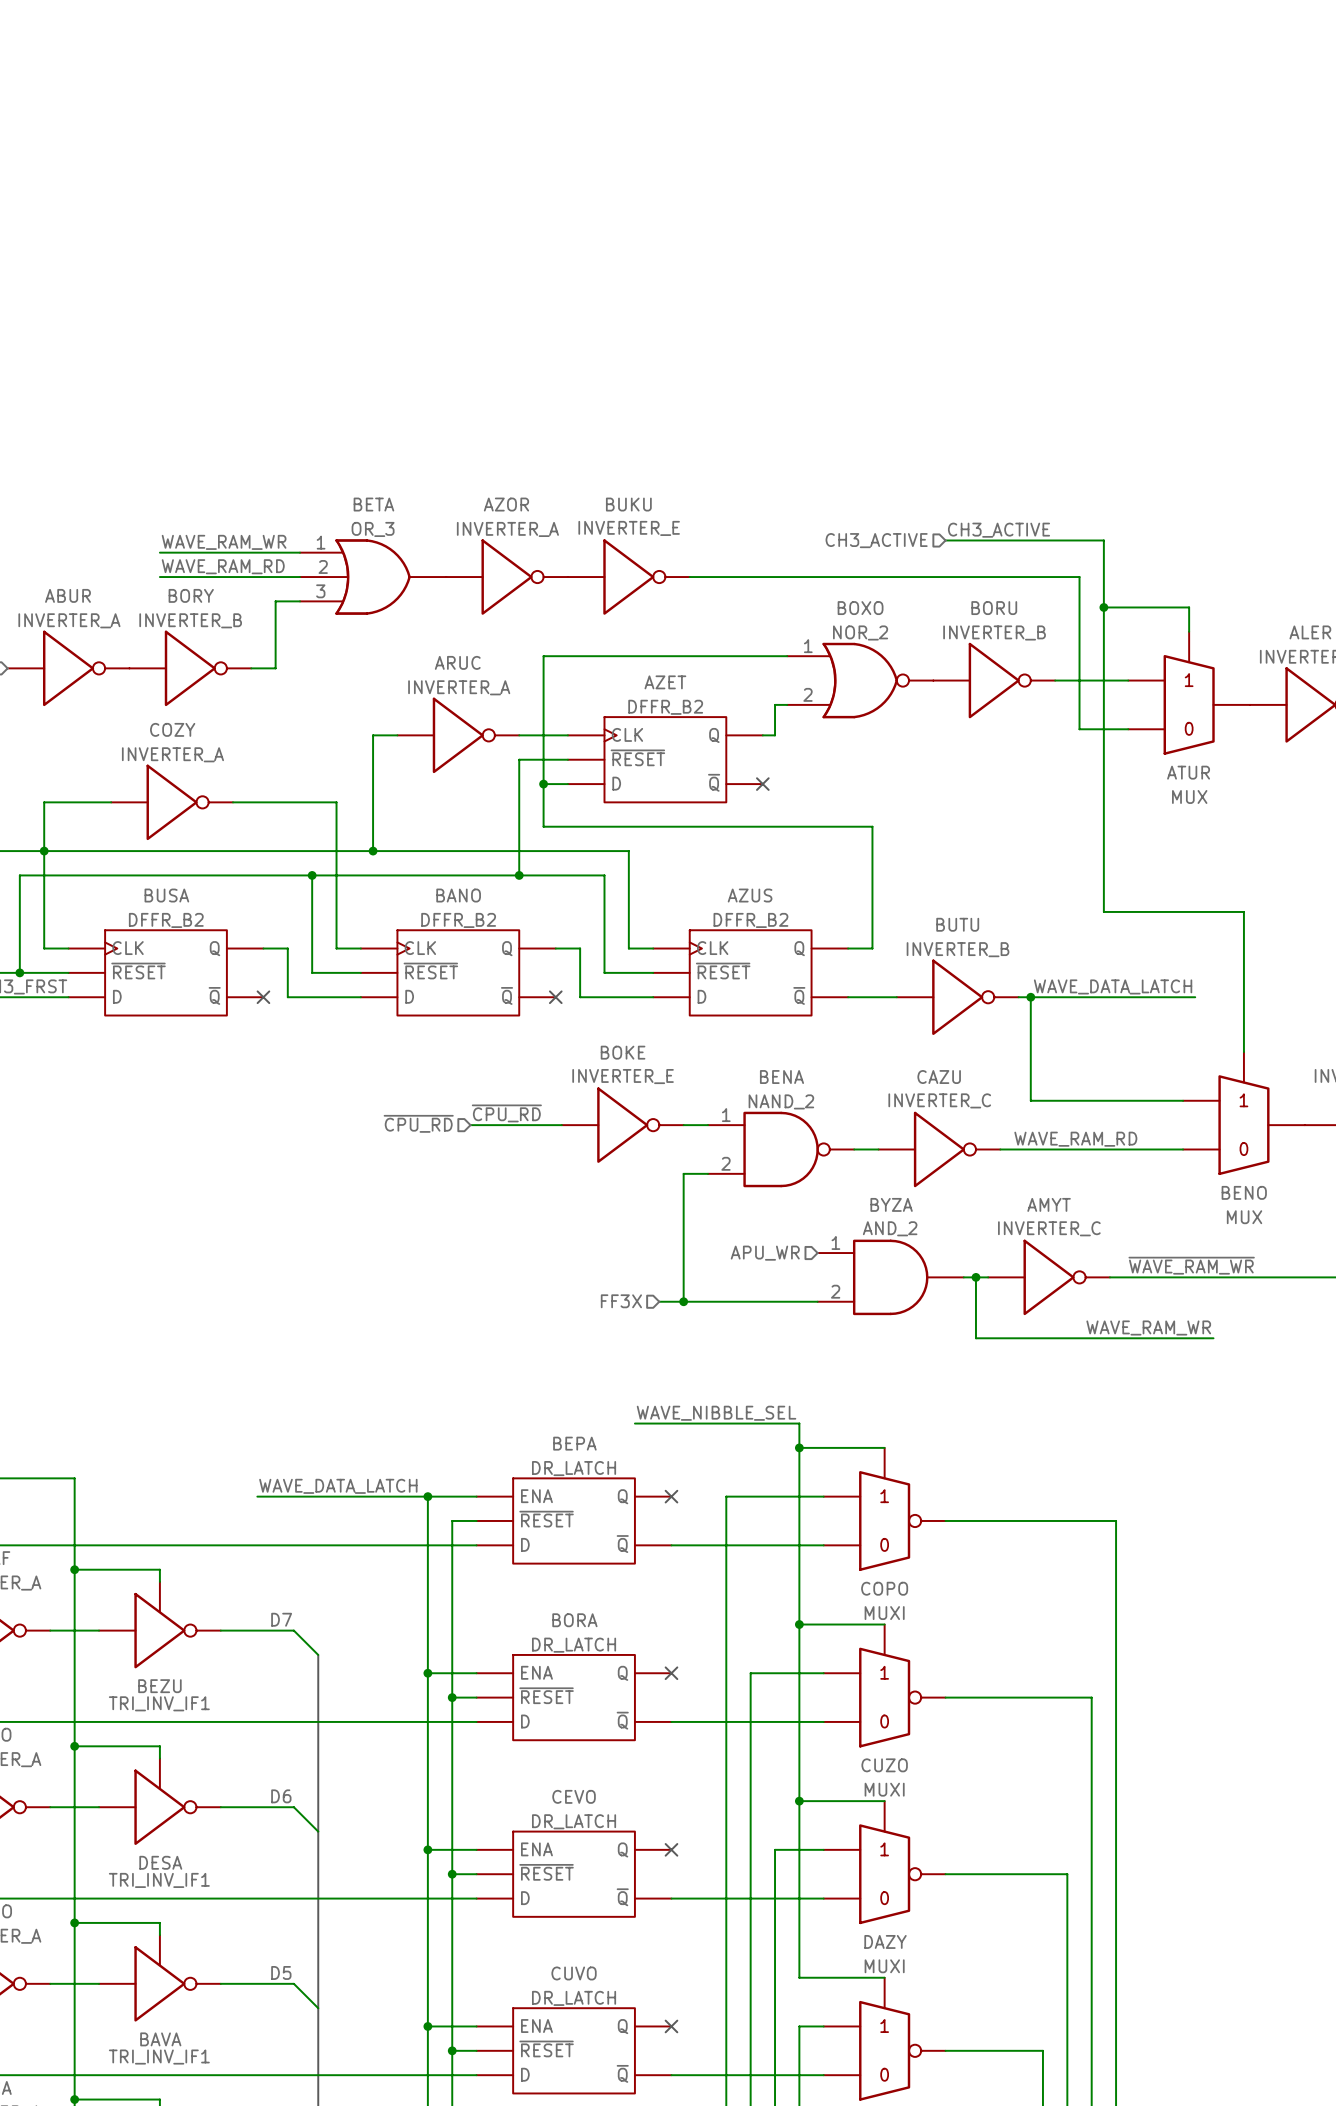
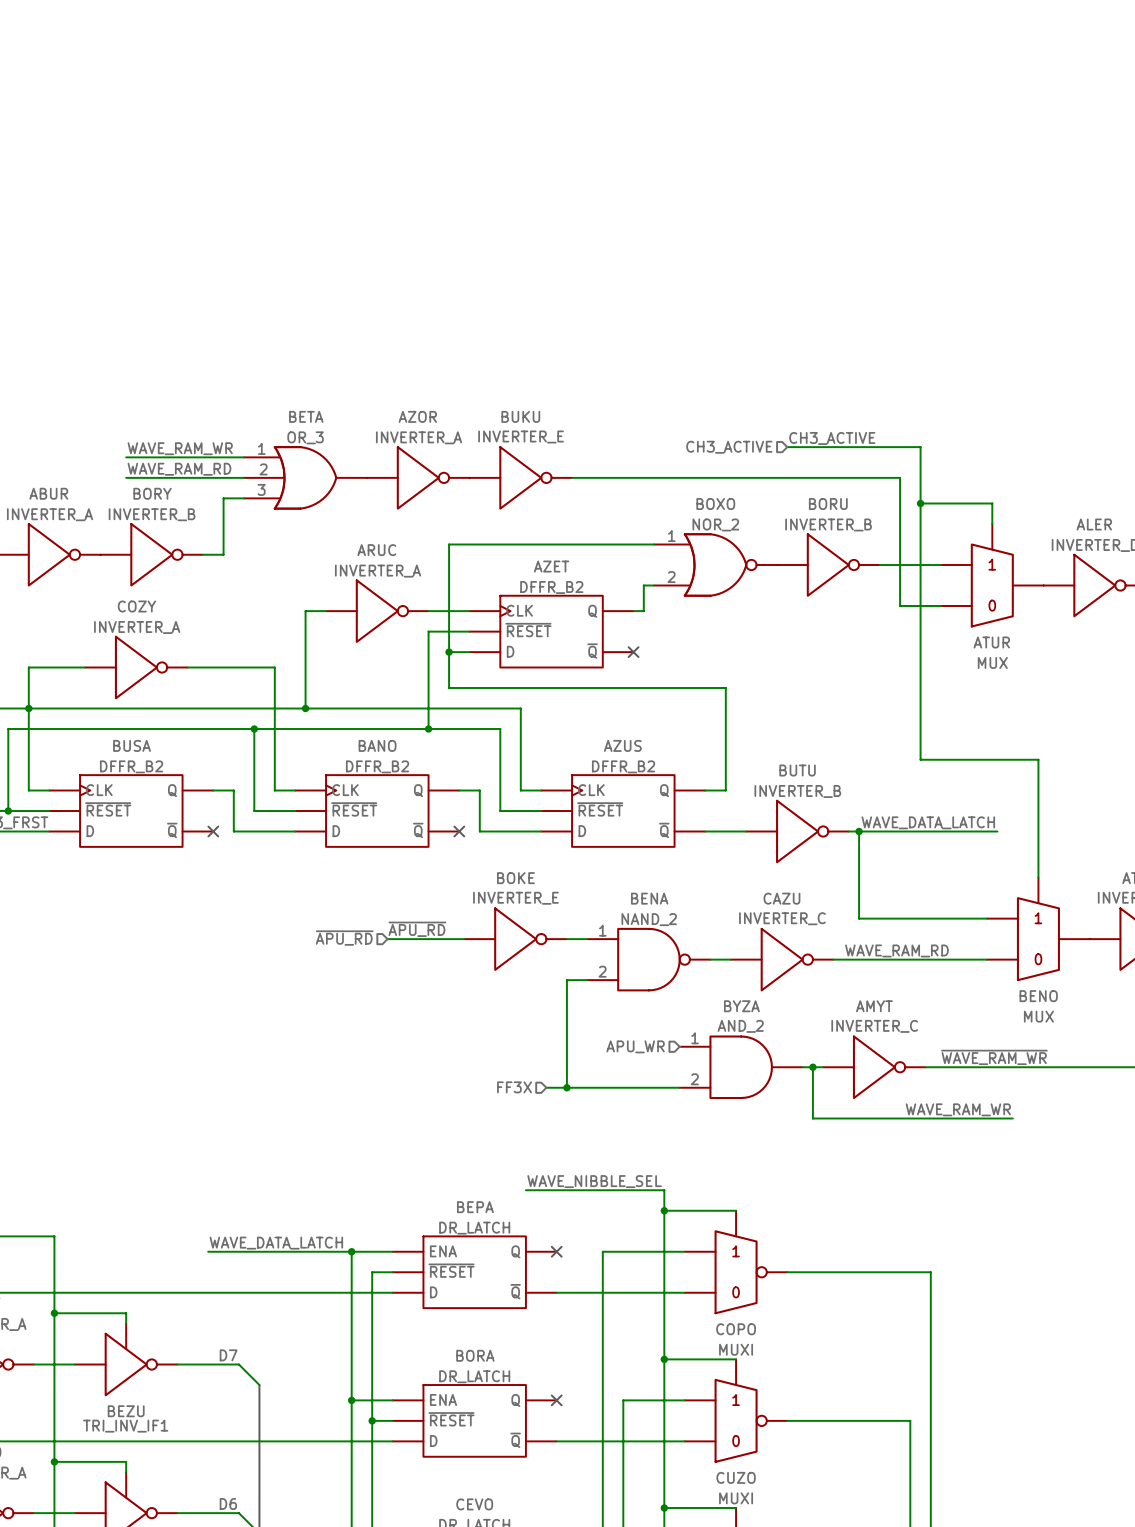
label: ~{CPU_RD} (506, 1113) -> ~{APU_RD} (417, 929)
hierarchical label: ~{CPU_RD} (418, 1123) -> ~{APU_RD} (344, 938)

